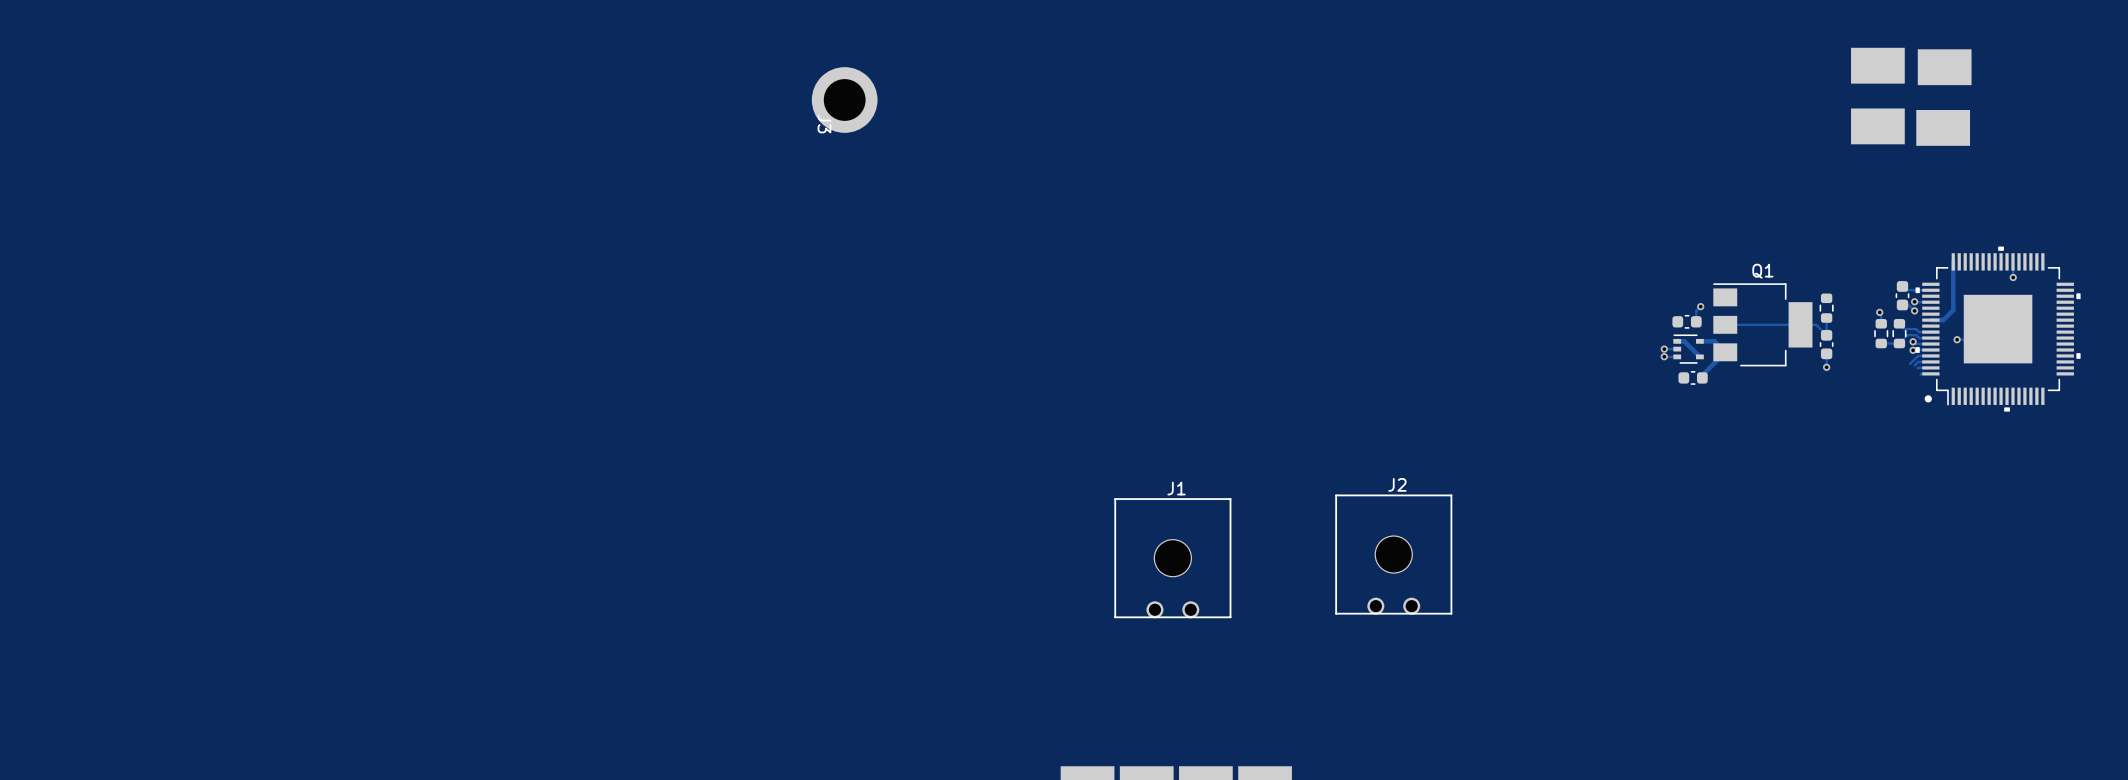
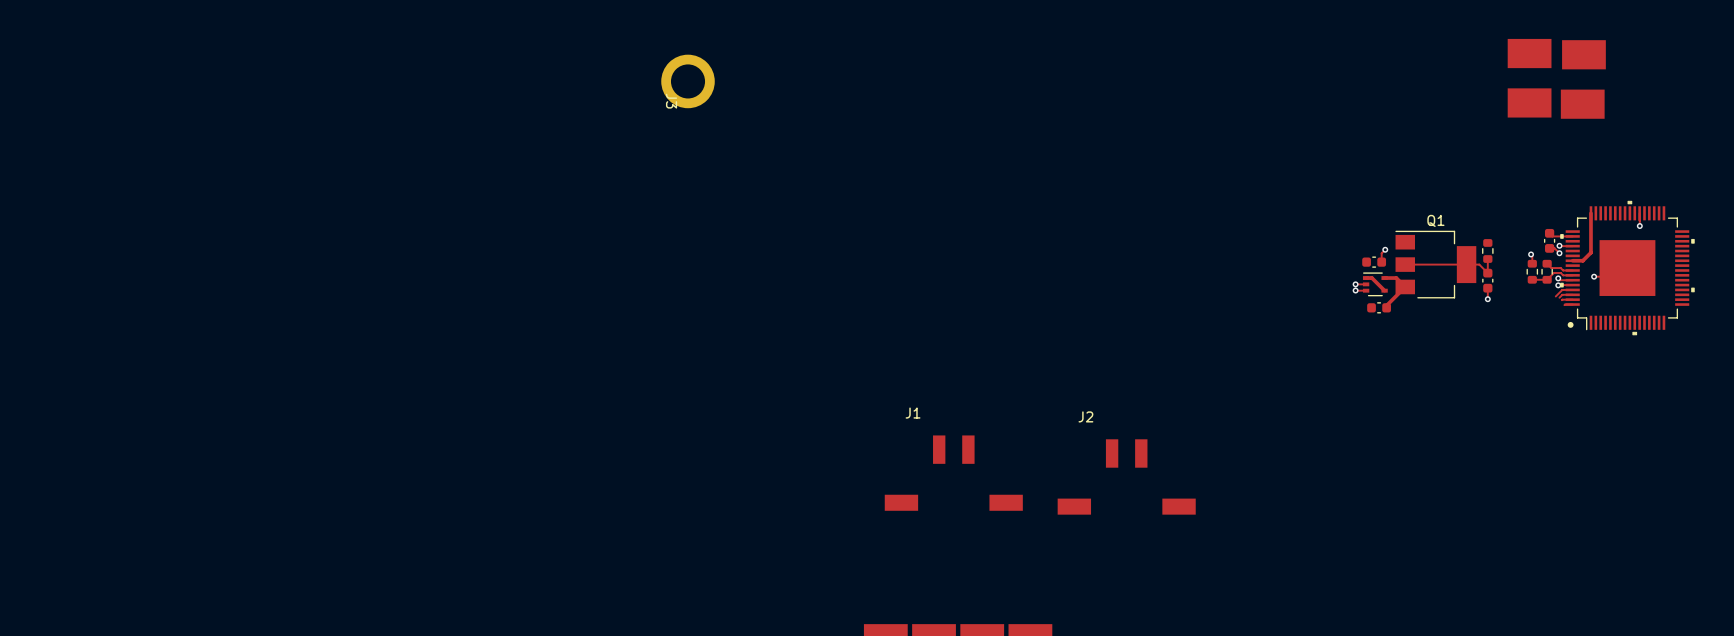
J2 name position: J2 (1397, 484) -> J2 (1085, 416)
J1 name position: J1 (1176, 488) -> J1 (913, 413)
J2 footprint: [1335, 494, 1453, 615] -> [1057, 439, 1196, 515]
J1 footprint: [1114, 498, 1232, 619] -> [884, 435, 1023, 511]

